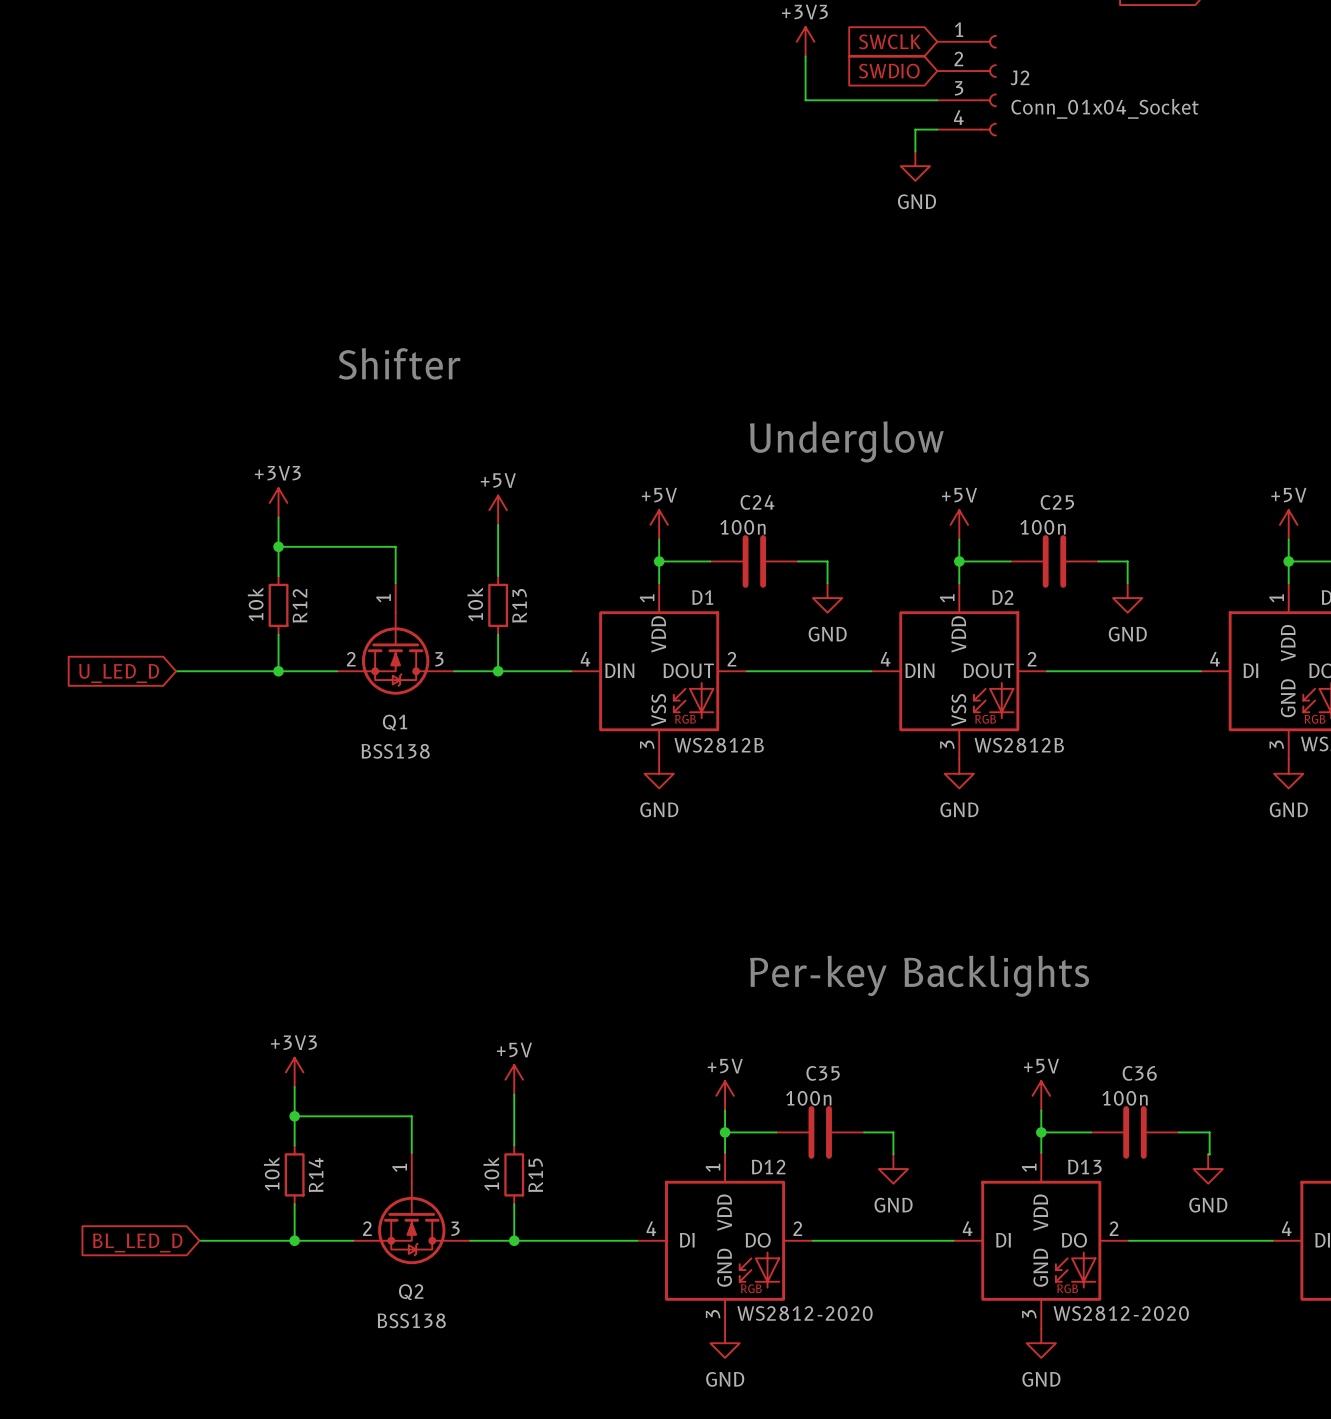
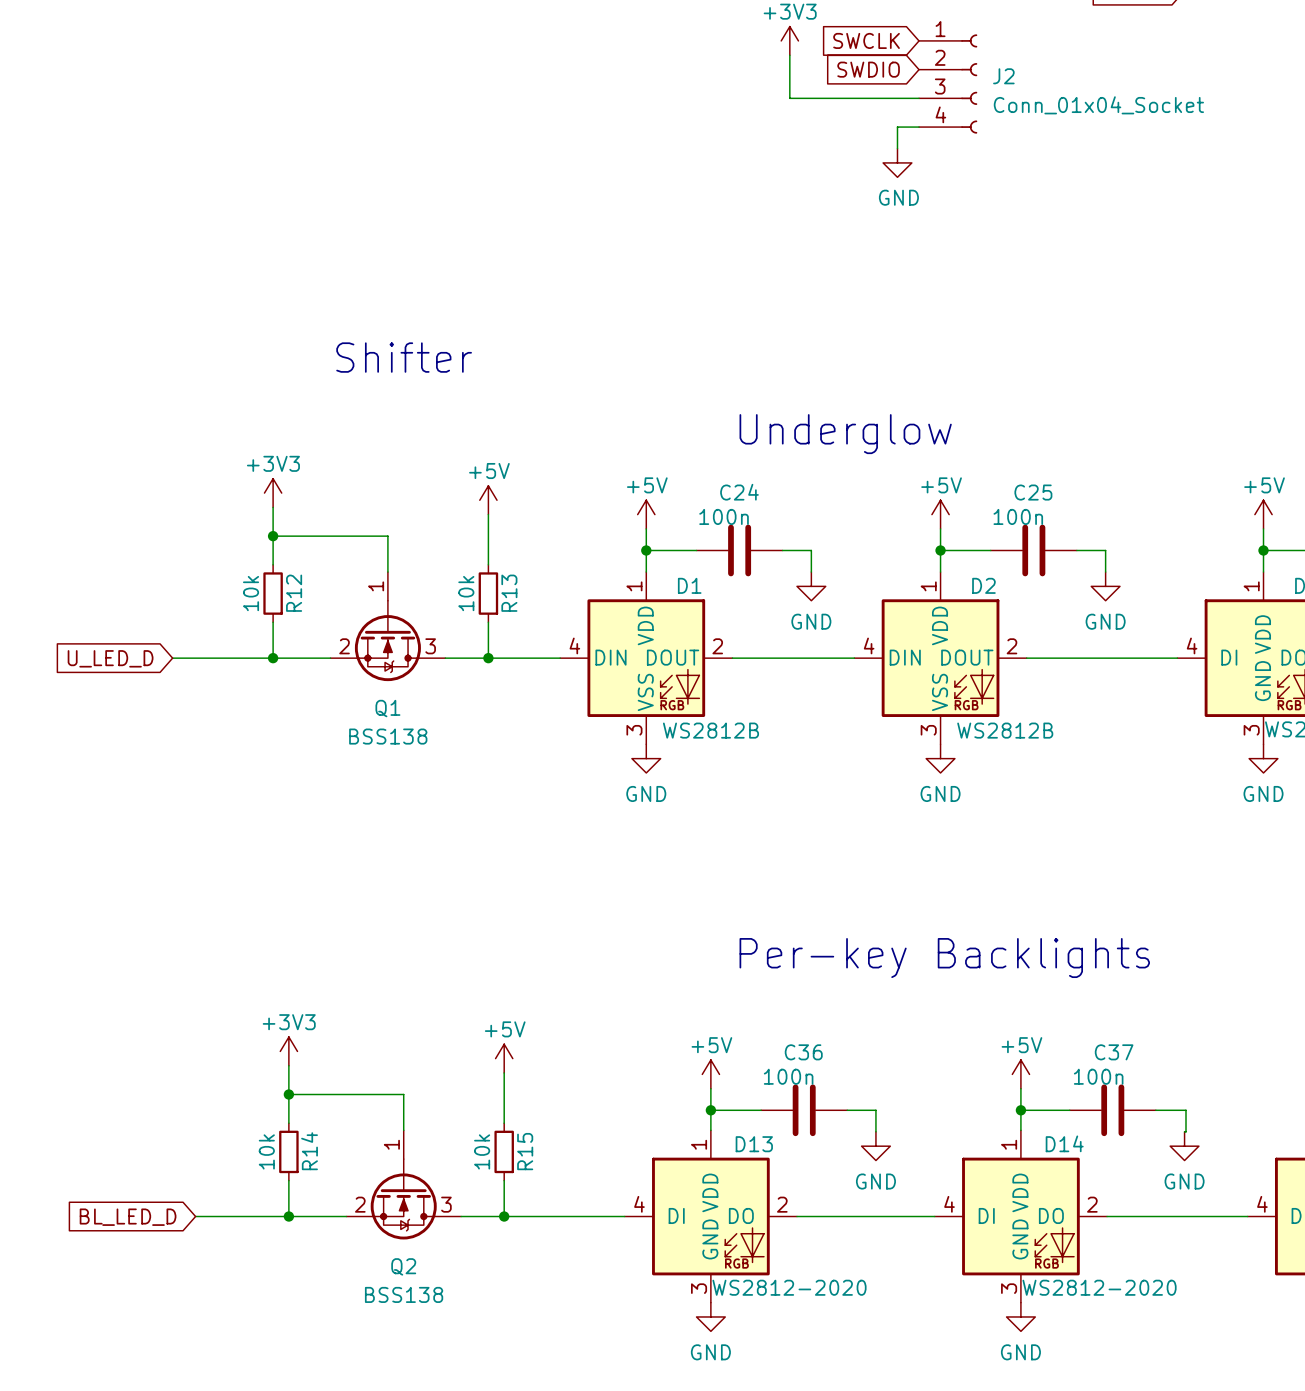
C35 name: C35 (823, 1073) -> C36 (803, 1052)
C36 name: C36 (1139, 1073) -> C37 (1114, 1052)
D12 name: D12 (768, 1167) -> D13 (754, 1144)
D13 name: D13 (1084, 1167) -> D14 (1064, 1143)

